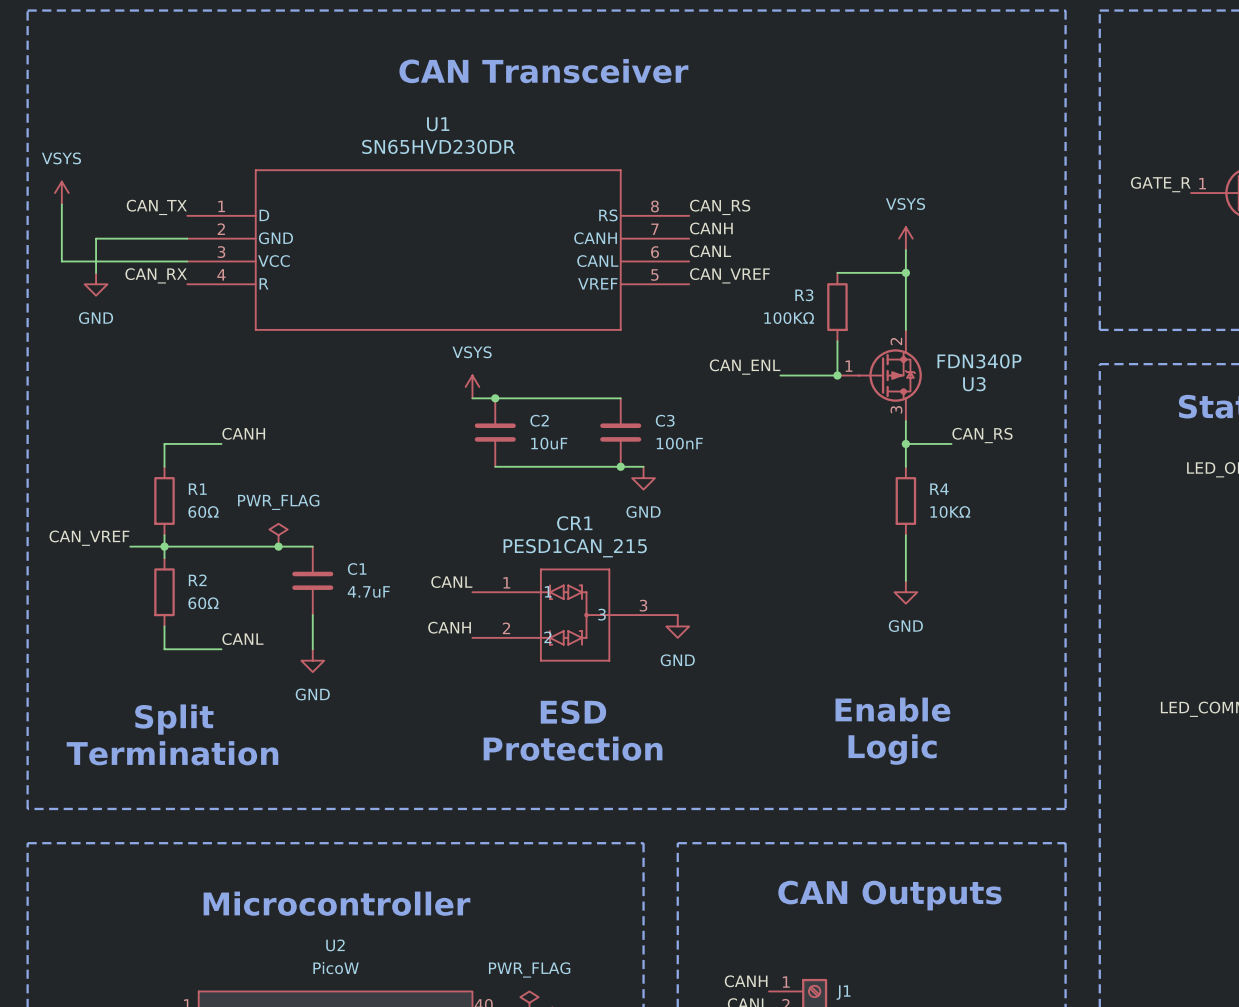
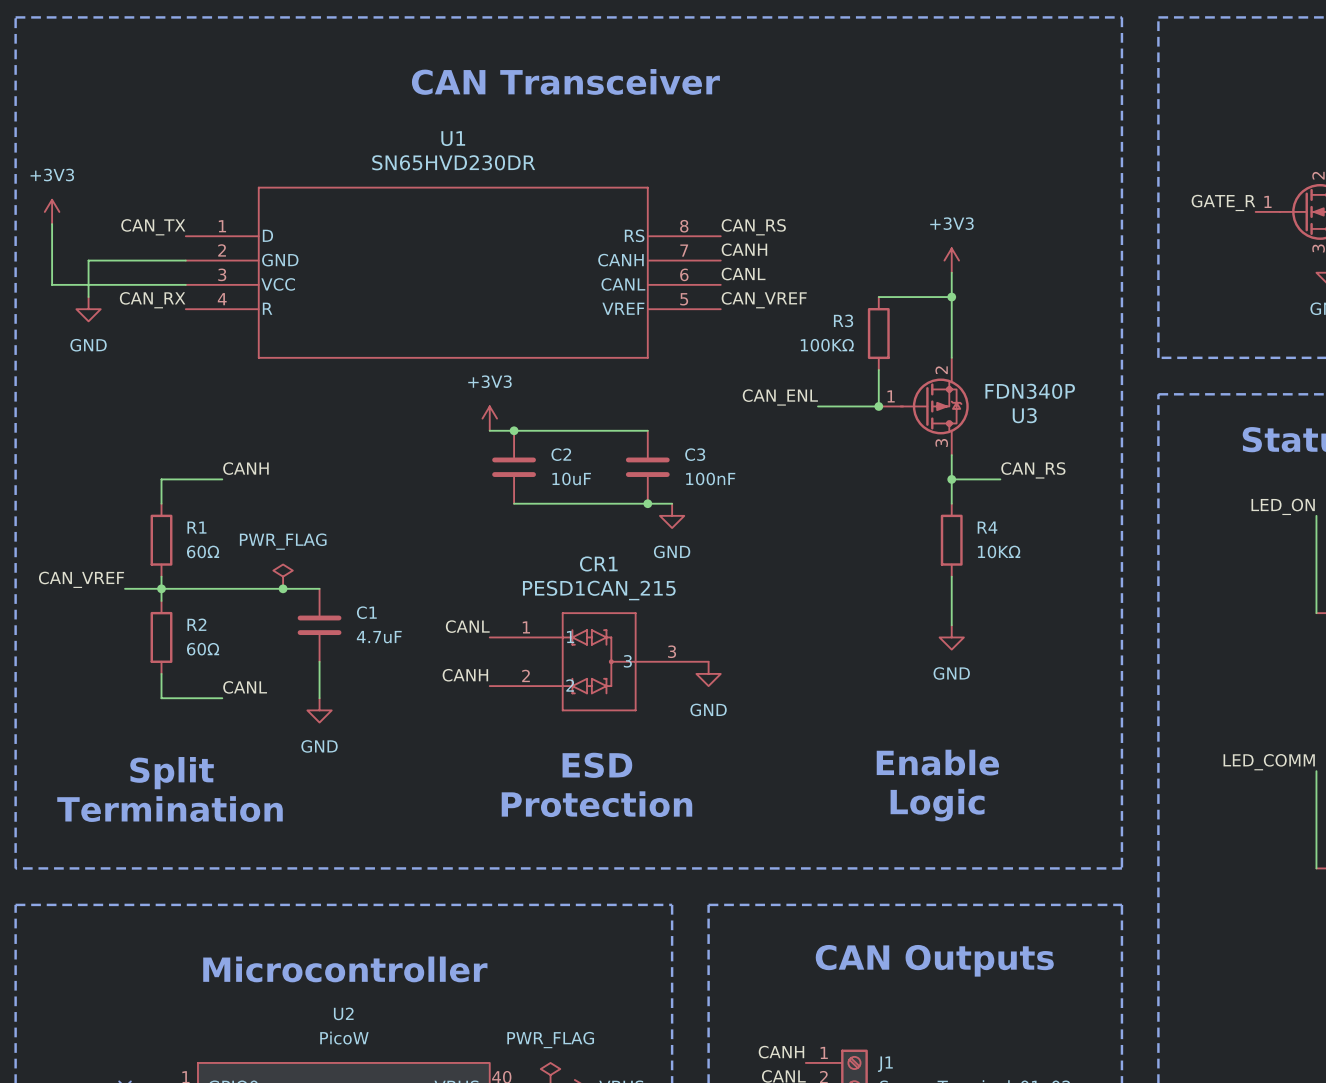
power symbol: VSYS (61, 193) -> +3V3 (52, 211)
power symbol: VSYS (905, 238) -> +3V3 (951, 260)
power symbol: VSYS (472, 386) -> +3V3 (489, 418)

